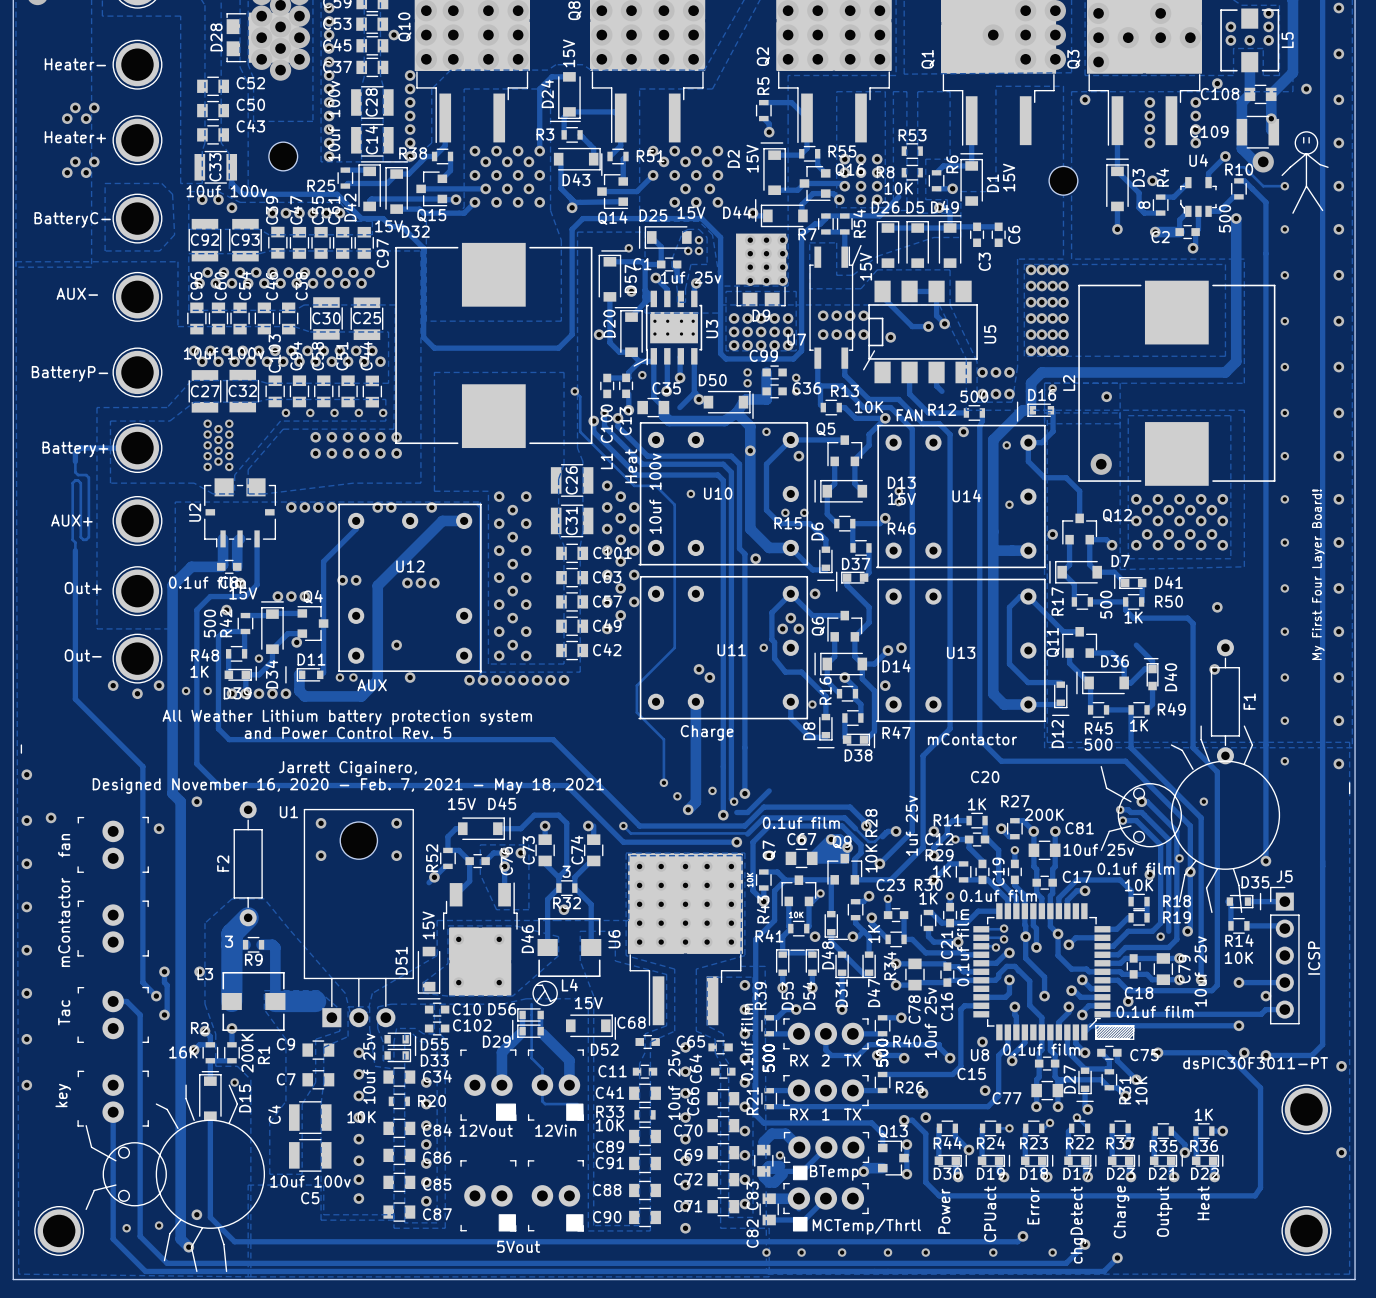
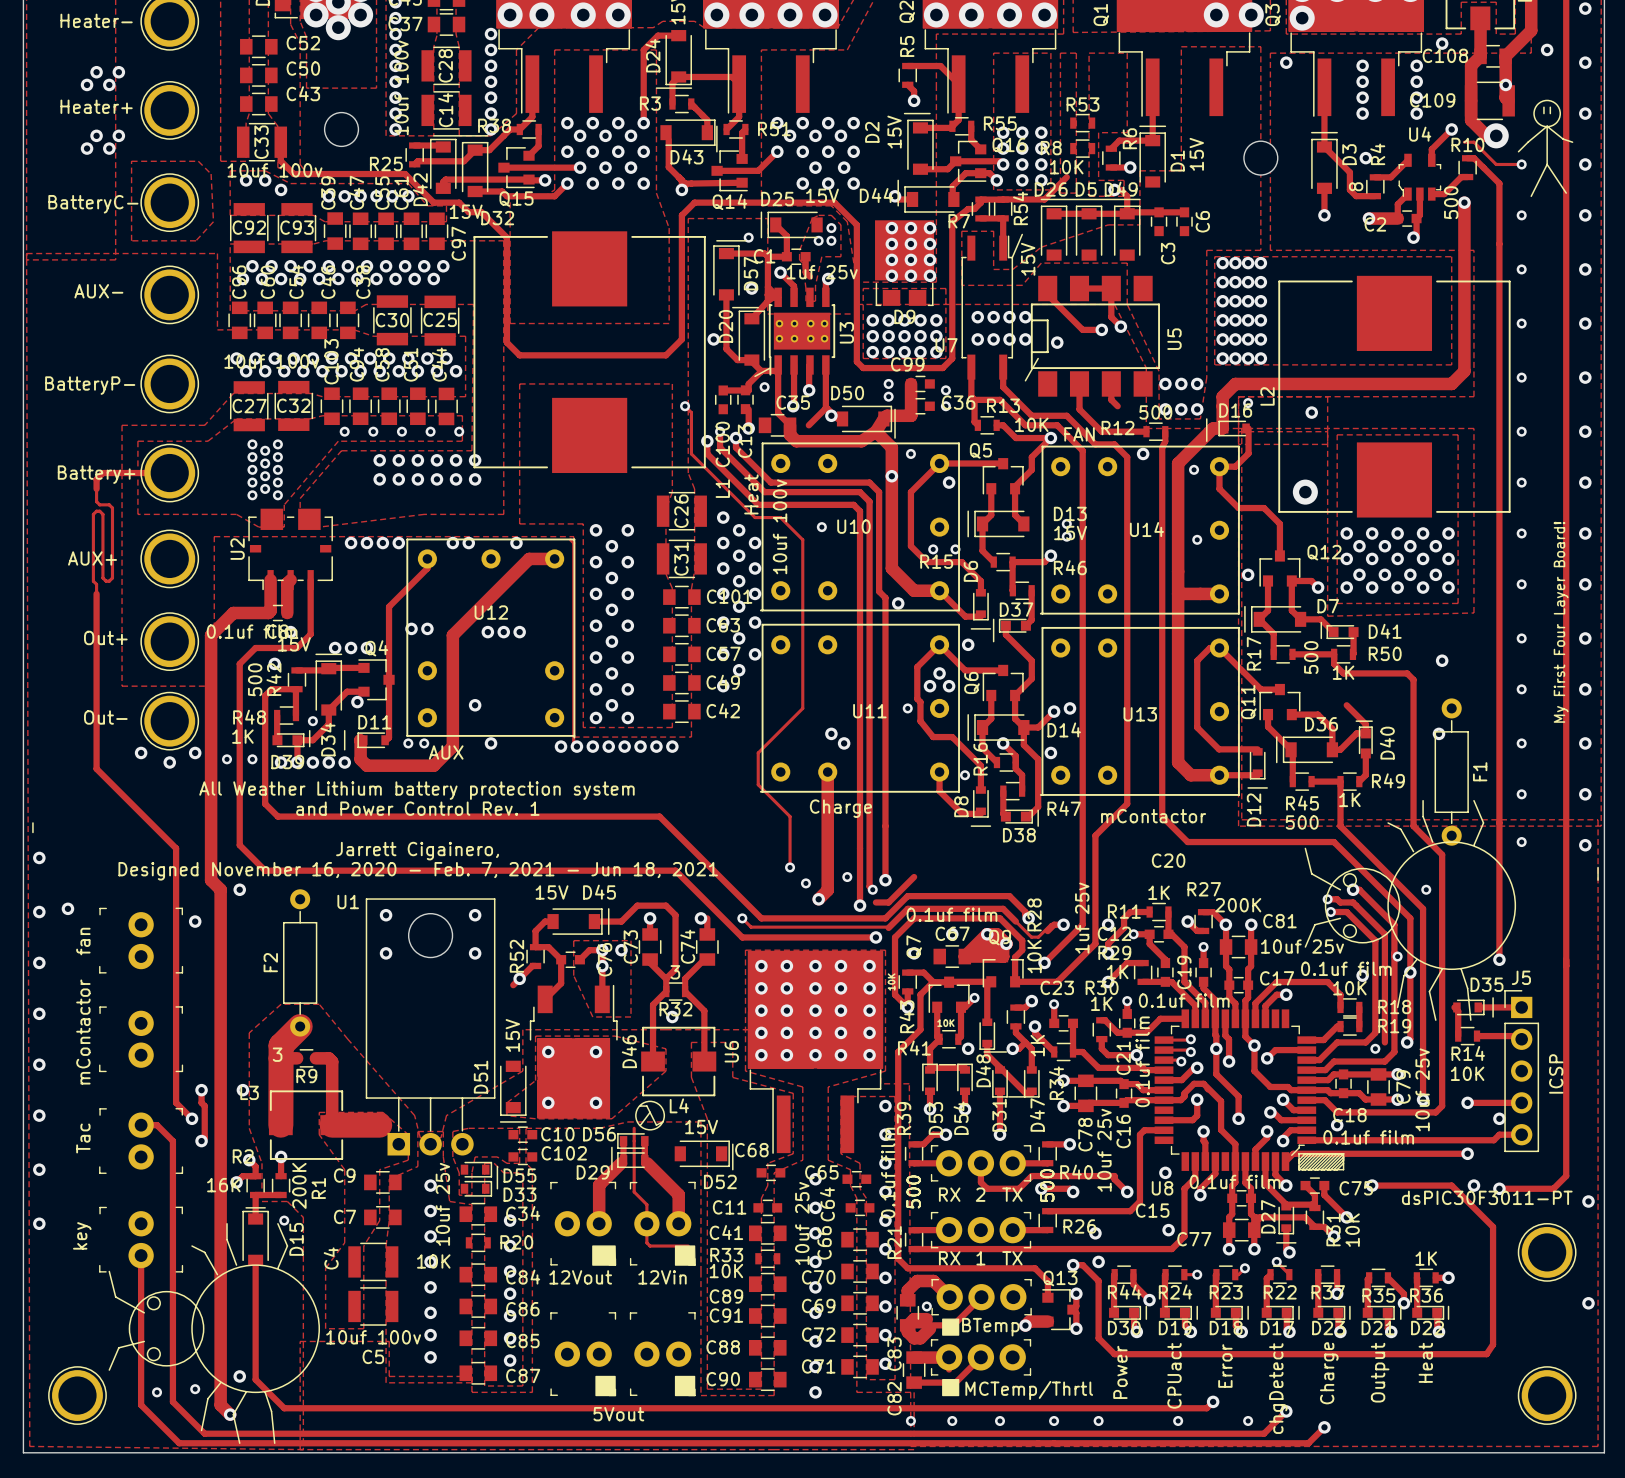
text: and Power Control Rev. 5 (348, 732) -> and Power Control Rev. 1 (417, 808)
text: Designed November 16, 2020 - Feb. 7, 2021 - May 18, 2021 (348, 786) -> Designed November 16, 2020 - Feb. 7, 2021 - Jun 18, 2021 (418, 871)

